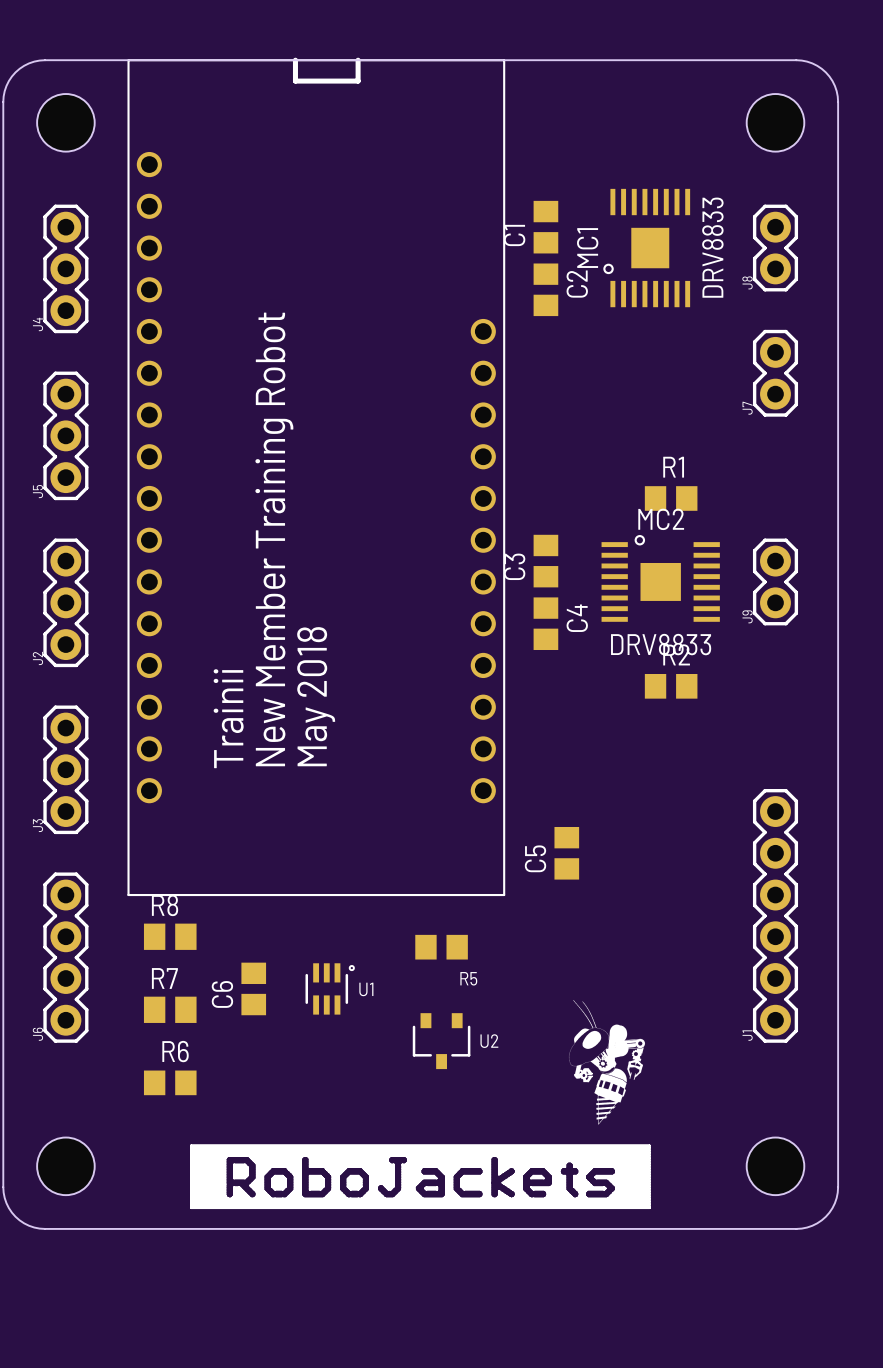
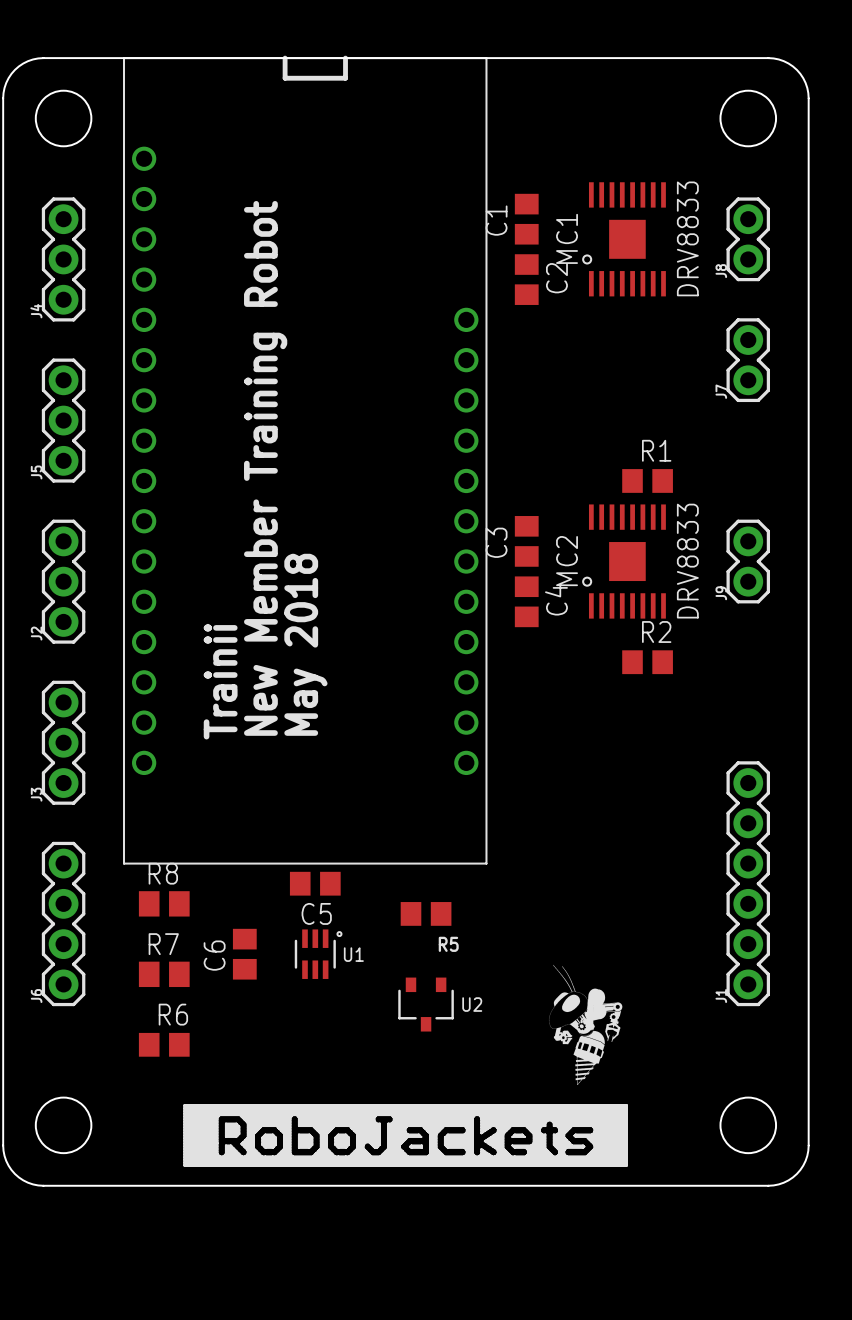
MC2 rotation: 0° (660, 578) -> 90° counterclockwise (624, 561)
C5 rotation: 0° (566, 853) -> 90° clockwise (315, 883)
C5 position: (566, 853) -> (315, 883)
C5 name position: C5 (535, 858) -> C5 (316, 913)

